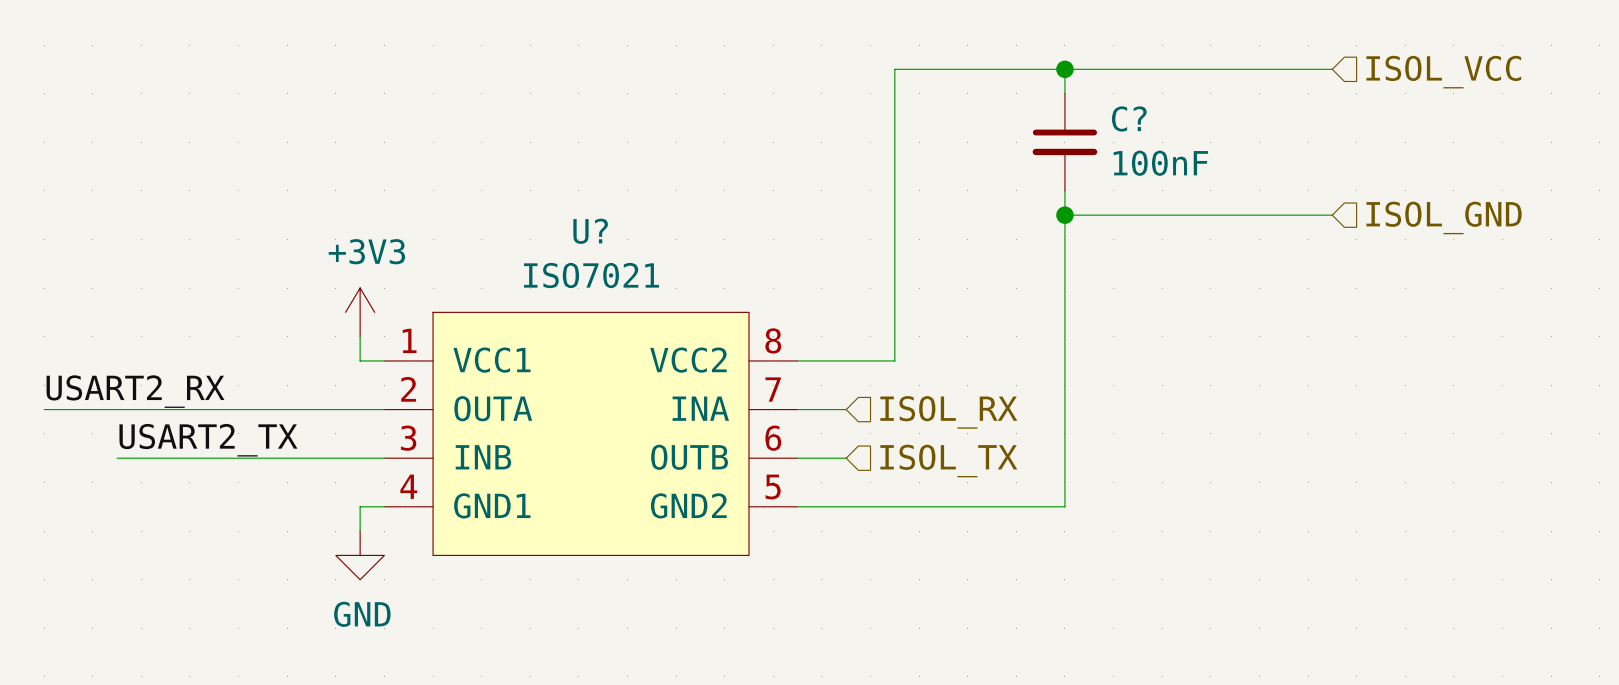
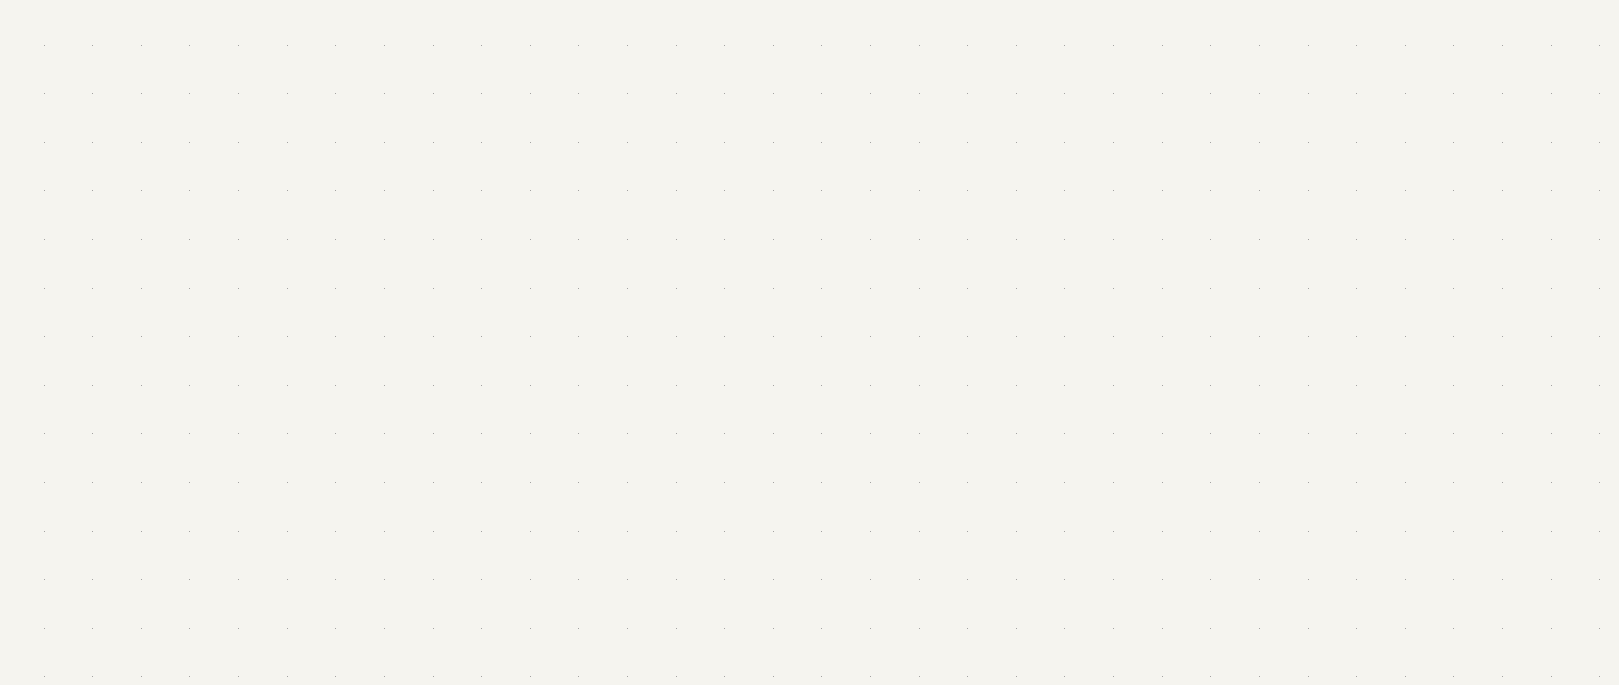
wire: (1064, 69) (1064, 93) -> none
junction: (1064, 69) -> none
wire: (1332, 69) (894, 69) (894, 360) (797, 360) -> none
hierarchical label: ISOL_VCC (1443, 72) -> none
C?: 100nF (1064, 142) -> none
wire: (1064, 190) (1064, 506) (797, 506) -> none
wire: (1064, 215) (1332, 215) -> none
junction: (1064, 215) -> none
hierarchical label: ISOL_GND (1444, 217) -> none
power symbol: +3V3 (360, 312) -> none
wire: (360, 336) (360, 360) (384, 360) -> none
label: USART2_RX (135, 391) -> none
wire: (44, 409) (384, 409) -> none
wire: (797, 409) (846, 409) -> none
hierarchical label: ISOL_RX (948, 412) -> none
U?: ISO7021 (591, 433) -> none
label: USART2_TX (208, 440) -> none
wire: (117, 458) (384, 458) -> none
wire: (797, 458) (846, 458) -> none
hierarchical label: ISOL_TX (948, 461) -> none
wire: (384, 506) (360, 506) (360, 531) -> none
power symbol: GND (360, 555) -> none

